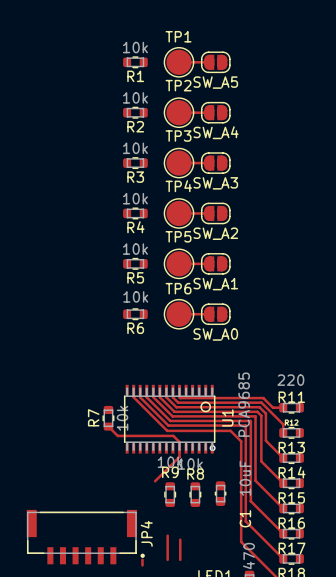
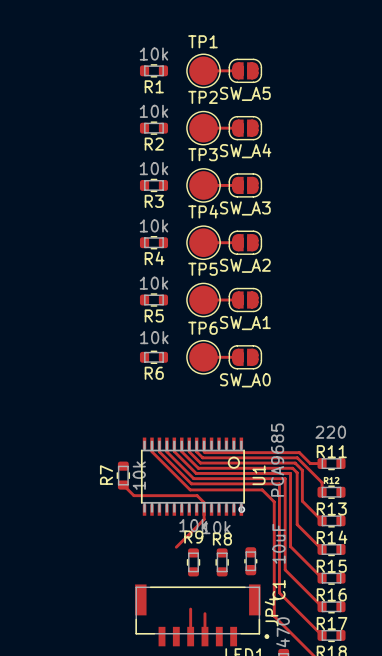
JP4 position: (85, 537) -> (202, 615)

